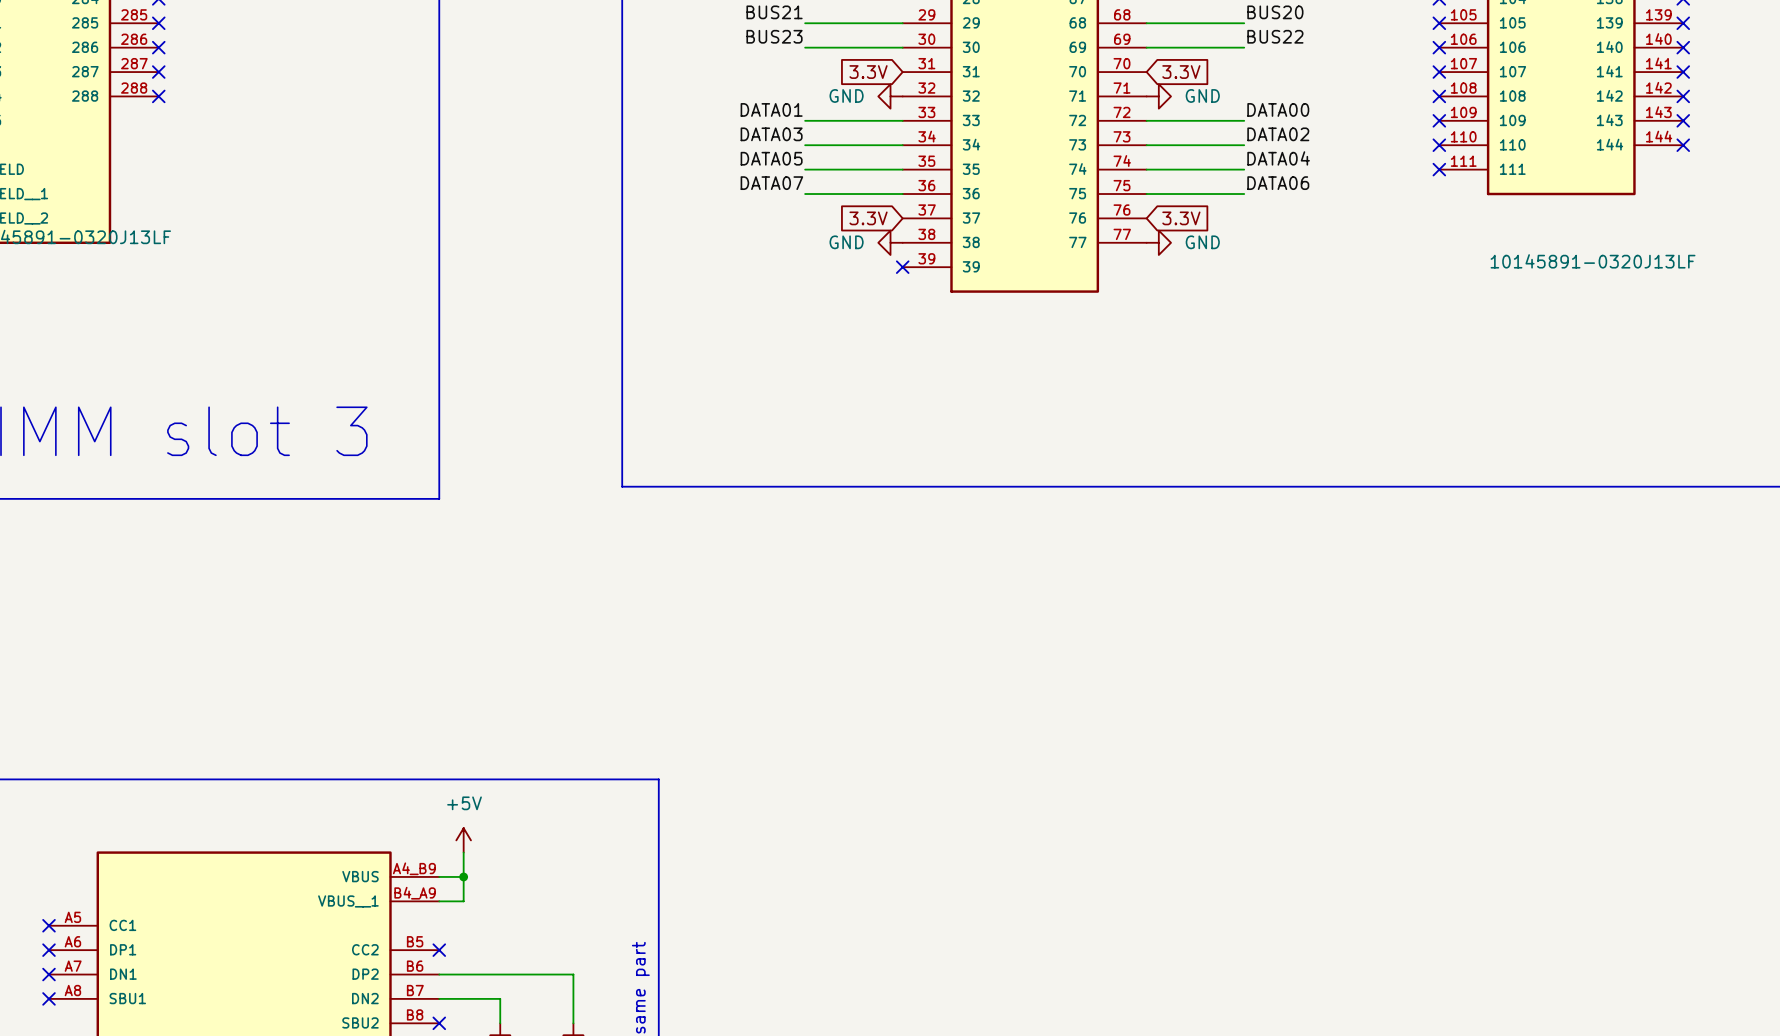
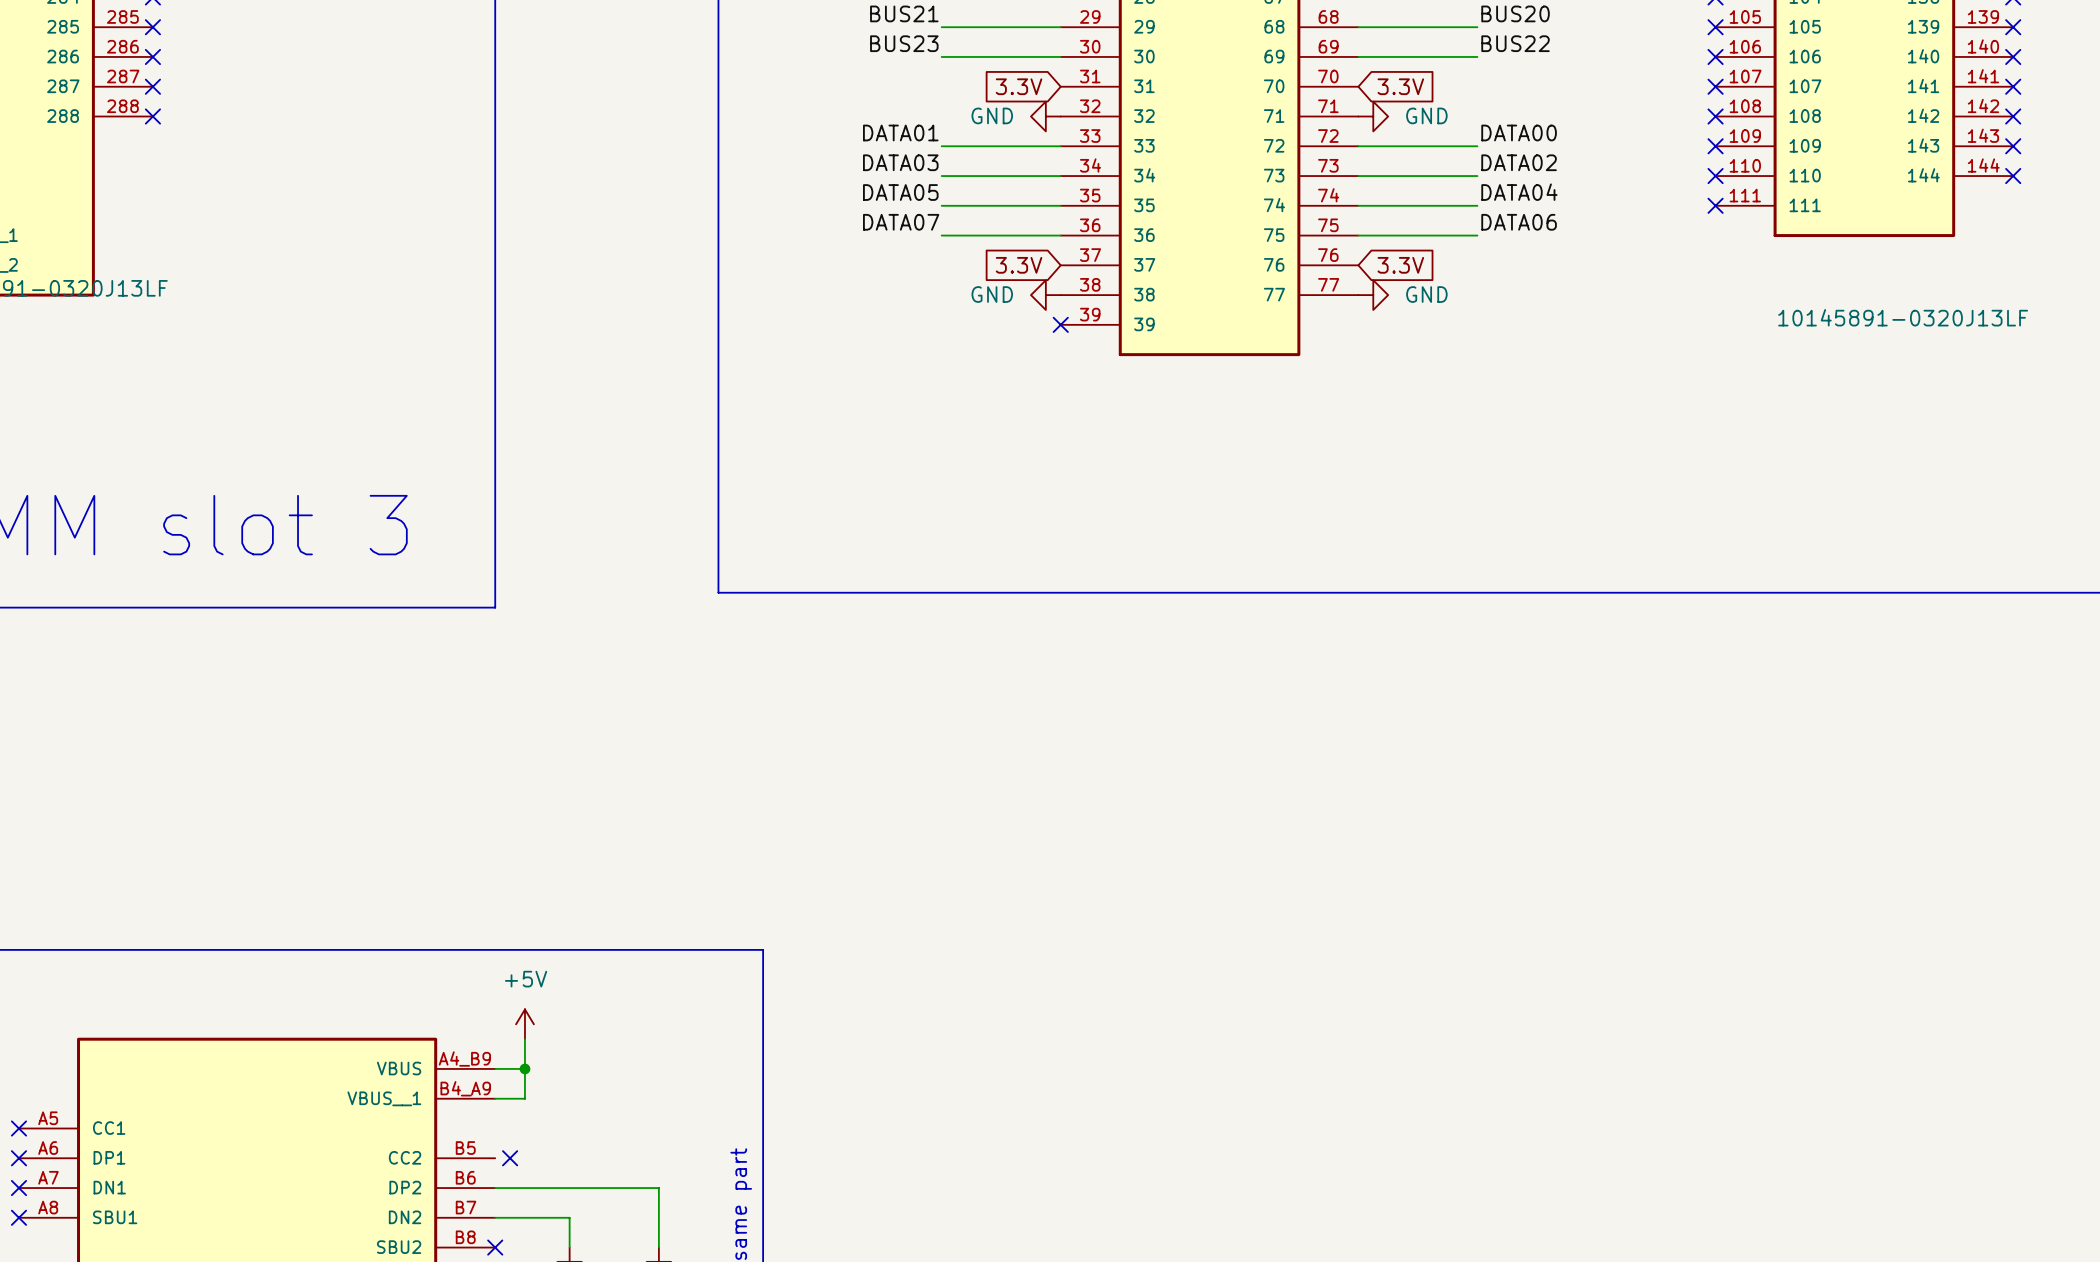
no-connect mark position: (439, 950) -> (510, 1158)

